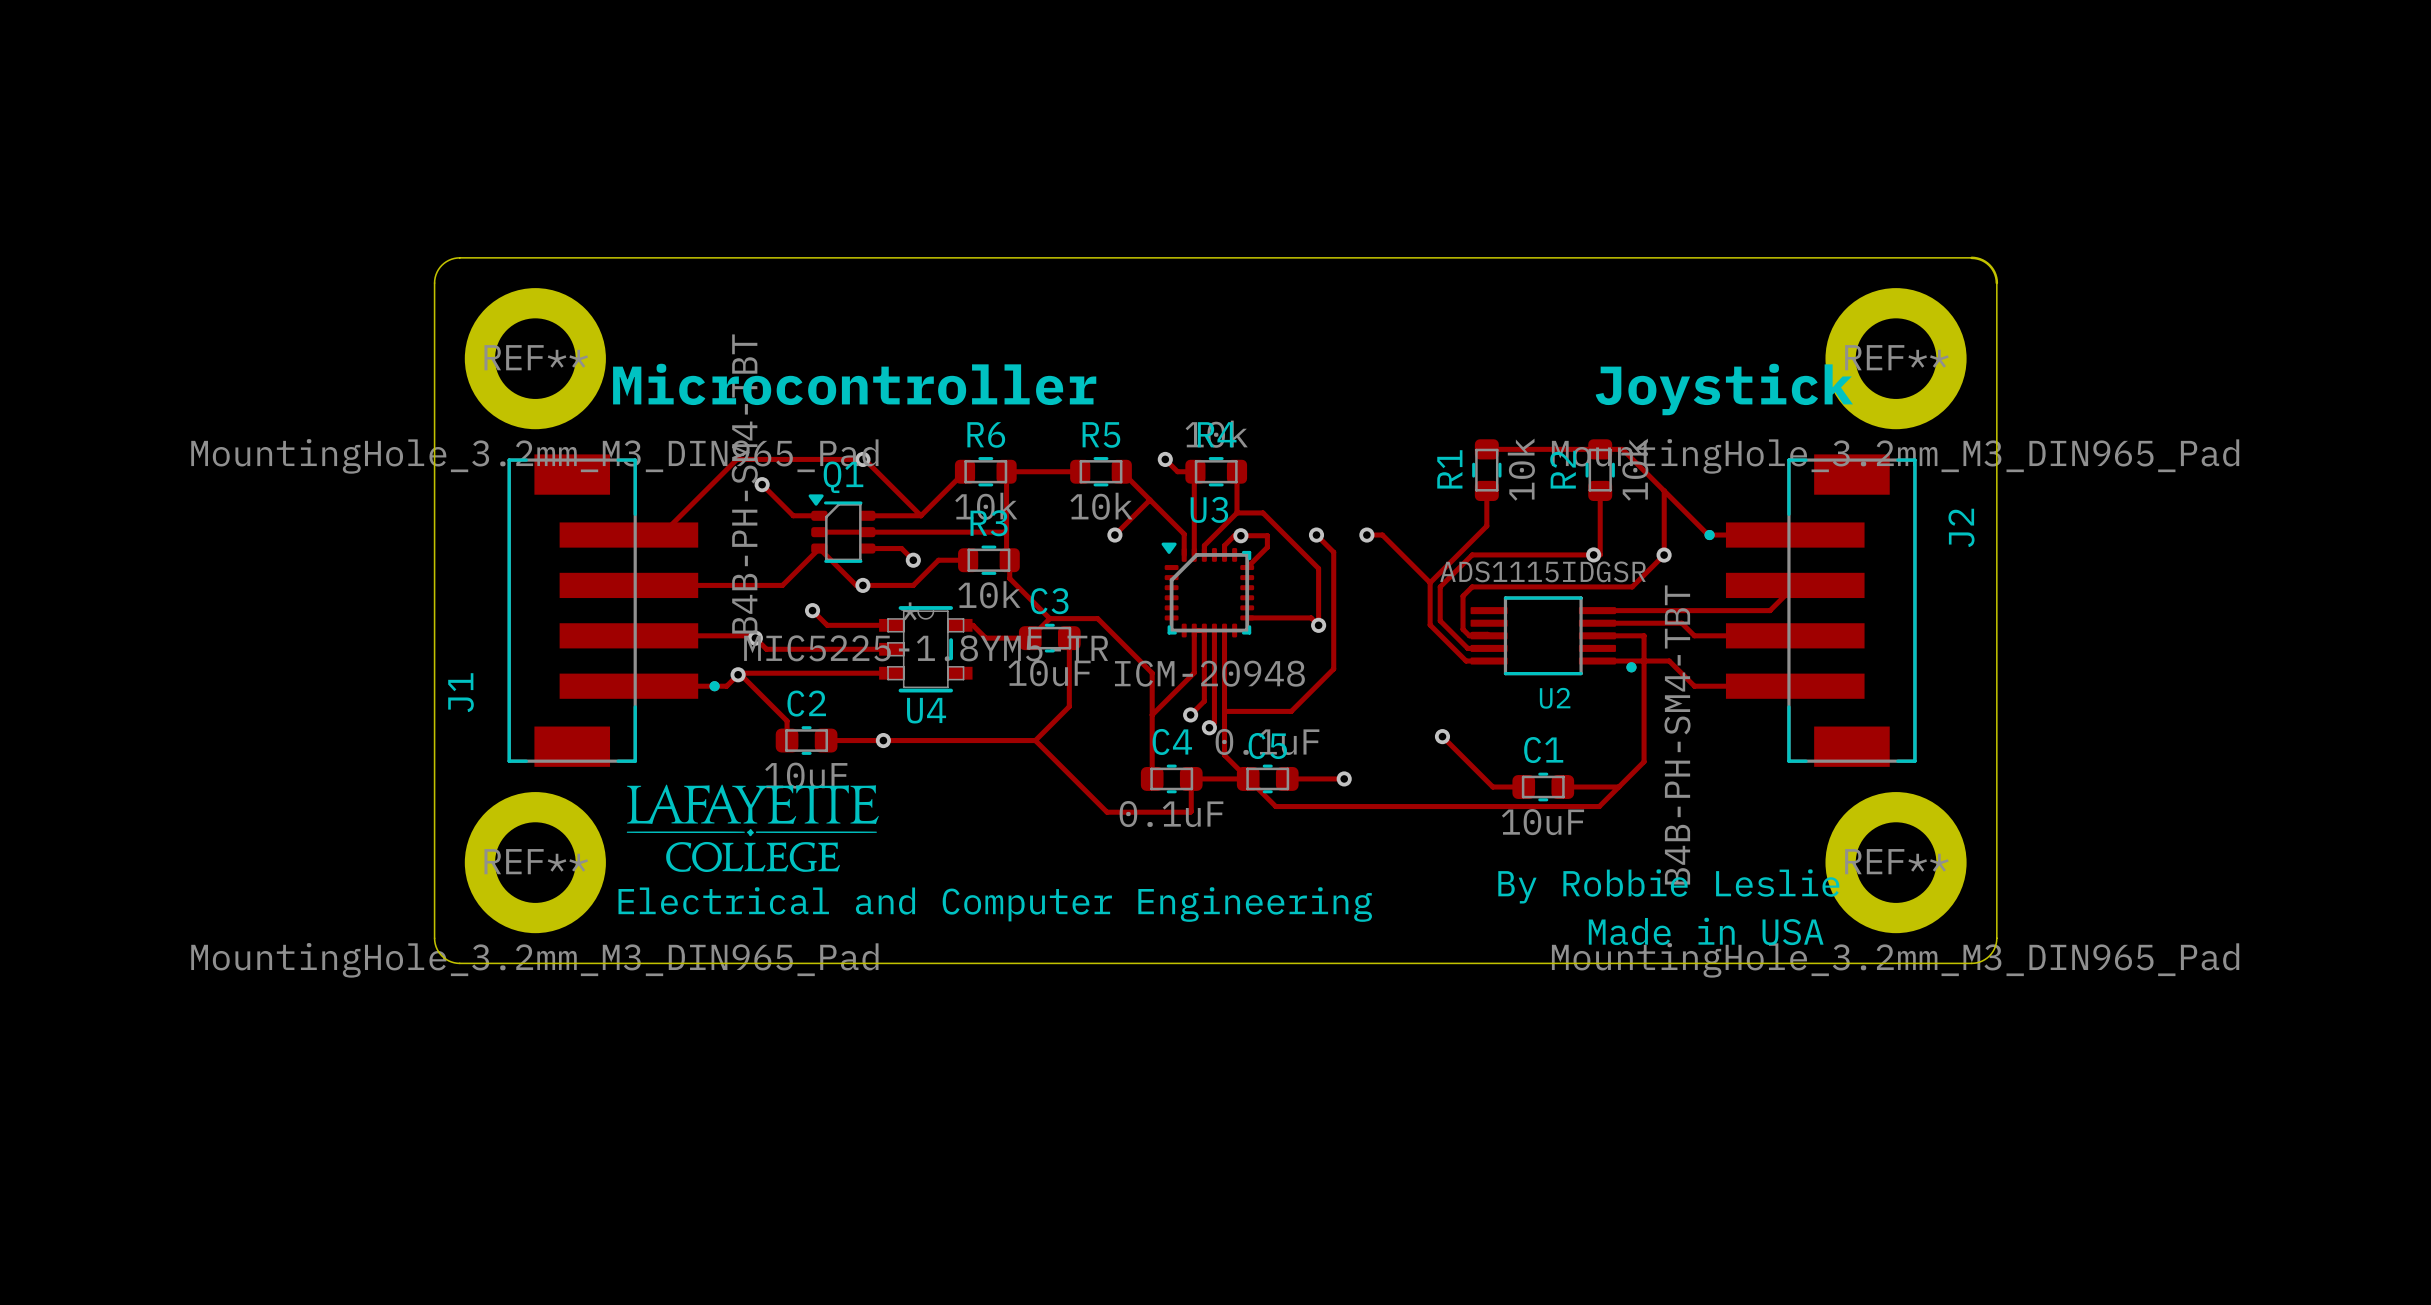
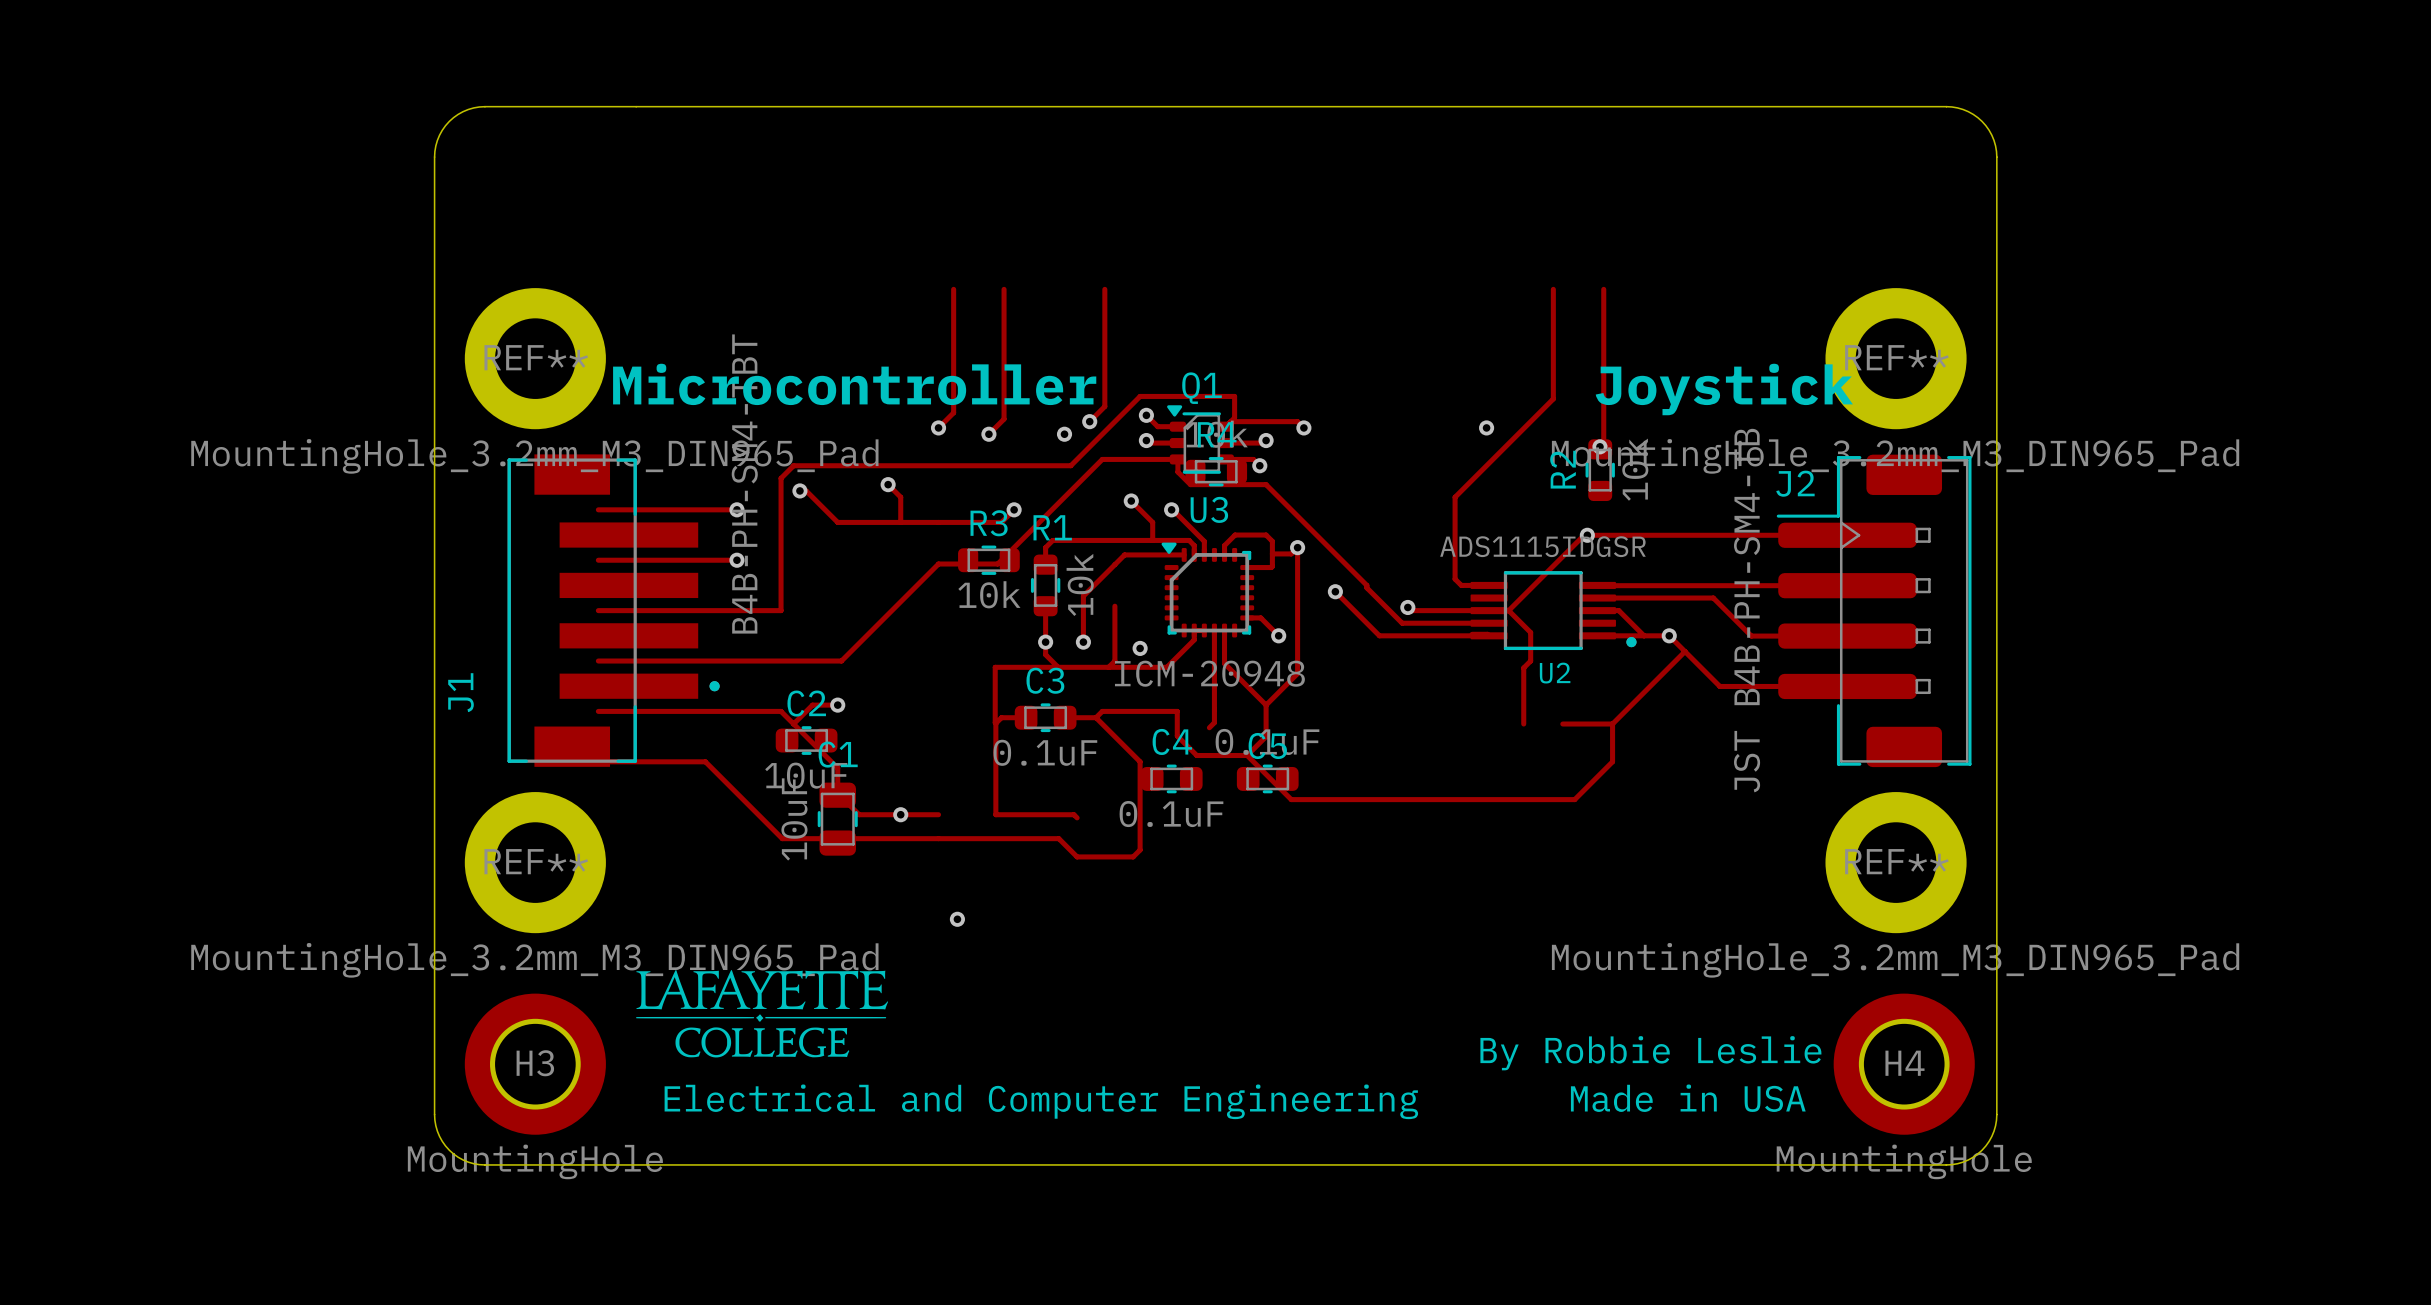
board edge: (434, 283) (437, 272) (441, 265) (451, 259) (459, 257) (1971, 257) (1982, 260) (1989, 265) (1995, 274) (1996, 283) -> (434, 283) (435, 145) (442, 130) (453, 117) (468, 109) (484, 106) (1952, 106) (1968, 111) (1982, 121) (1991, 135) (1995, 145) (1996, 283)
track: none -> (953, 289) (953, 412) (938, 427)
track: none -> (1004, 289) (1004, 419) (988, 434)
track: none -> (1104, 289) (1104, 406) (1089, 421)
track: none -> (1553, 289) (1553, 398) (1455, 497) (1455, 579) (1461, 585) (1489, 585)
track: none -> (1603, 289) (1603, 443) (1599, 446)
track: none -> (1146, 415) (1157, 426) (1177, 426)
via: none -> (1146, 415)
via: none -> (1089, 421)
track: none -> (1230, 421) (1297, 421) (1303, 427)
track: none -> (1225, 426) (1234, 417) (1234, 396) (1140, 396) (1070, 465) (793, 465) (781, 478) (781, 610) (598, 610)
via: none -> (938, 427)
via: none -> (1303, 427)
via: none -> (1486, 427)
via: none -> (988, 434)
via: none -> (1064, 434)
track: none -> (1146, 440) (1148, 443) (1177, 443)
via: none -> (1146, 440)
track: none -> (1266, 440) (1263, 443) (1225, 443)
via: none -> (1266, 440)
via: none -> (1599, 446)
track: (1486, 449) (1622, 449) (1708, 535) (1795, 535) -> none
J2 footprint: [1704, 454, 1917, 767] -> [1776, 454, 1972, 768]
via: (862, 459) -> none
track: (1165, 459) (1177, 471) (1195, 471) (1194, 545) -> (1045, 564) (1045, 547) (1052, 540) (1189, 540) (1194, 545)
via: (1165, 459) -> none
track: none -> (1225, 459) (1253, 459) (1259, 465)
via: none -> (1259, 465)
R1 name rotation: 0° (1449, 469) -> 90° clockwise (1052, 527)
R1 name position: R1 (1449, 469) -> R1 (1052, 527)
R1 position: (1486, 470) -> (1045, 585)
track: (965, 471) (920, 515) -> none
R6: 10k (985, 471) -> none
track: (1080, 471) (1006, 471) (1006, 557) (1009, 560) (1009, 578) (1049, 618) -> none
R5: 10k (1101, 471) -> none
track: (1121, 471) (1184, 534) (1184, 554) -> (1083, 642) (1083, 596) (1124, 554) (1184, 554)
track: (1236, 471) (1236, 512) -> none
track: (762, 484) (793, 515) (819, 515) -> none
via: (762, 484) -> none
track: none -> (888, 484) (900, 497) (900, 522)
via: none -> (888, 484)
track: none -> (799, 490) (806, 490) (837, 522) (1001, 522) (1014, 509)
via: none -> (799, 490)
track: (1486, 490) (1486, 526) (1430, 582) -> none
track: (1600, 490) (1600, 554) (1472, 554) (1440, 586) (1440, 620) (1467, 648) (1489, 648) -> none
track: (1664, 490) (1664, 554) (1632, 586) (1472, 586) (1463, 596) (1463, 629) (1469, 635) -> (1335, 591) (1379, 635) (1469, 635)
track: (1150, 499) (1114, 535) -> none
track: none -> (1131, 501) (1152, 522) (1152, 540)
via: none -> (1131, 501)
track: none -> (598, 509) (736, 509)
via: none -> (736, 509)
via: none -> (1014, 509)
via: none -> (1171, 509)
track: (1236, 512) (1204, 545) -> (1171, 509) (1204, 541) (1204, 545)
track: (1236, 512) (1262, 512) (1318, 568) (1318, 625) (1311, 617) (1260, 617) -> (1278, 635) (1260, 617)
track: (867, 515) (920, 515) -> none
track: (920, 515) (864, 459) (736, 459) (661, 535) (628, 535) -> none
J2 name position: J2 (1961, 527) -> J2 (1795, 483)
Q1 position: (842, 528) -> (1200, 439)
track: (819, 532) (1003, 532) (1006, 535) -> none
via: (1114, 535) -> none
track: (1234, 535) (1267, 535) (1267, 547) (1247, 567) -> (1234, 535) (1266, 535) (1272, 541) (1272, 566) (1247, 567)
via: (1240, 535) -> none
track: none -> (1316, 535) (1266, 484) (1190, 484) (1177, 472) (1177, 459) (1102, 459) (997, 564) (938, 564) (841, 661) (598, 661)
via position: (1316, 535) -> (1297, 547)
track: (1366, 535) (1382, 535) (1430, 582) -> none
via: (1366, 535) -> none
track: none -> (1847, 535) (1584, 535) (1508, 610)
track: (867, 548) (901, 548) (913, 560) -> none
track: (1333, 552) (1333, 668) (1291, 711) (1224, 711) -> (1333, 552) (1402, 623) (1489, 623)
track: none -> (1272, 553) (1291, 553) (1297, 547) (1297, 673) (1266, 705)
via position: (1593, 554) -> (1587, 535)
via: (1664, 555) -> none
track: none -> (598, 560) (736, 560)
via: none -> (736, 560)
via: (913, 560) -> none
track: (968, 560) (938, 560) (913, 585) (856, 585) (819, 548) (782, 585) (628, 585) -> none
track: (1430, 582) (1430, 625) (1466, 661) (1489, 661) -> none
via: (862, 585) -> none
track: none -> (1597, 585) (1847, 585)
track: (1795, 585) (1770, 610) (1618, 610) -> (1847, 686) (1719, 686) (1669, 635) (1644, 635) (1618, 610)
via: none -> (1335, 591)
track: none -> (1597, 598) (1713, 598) (1751, 636) (1847, 636)
track: none -> (1404, 604) (1410, 610) (1508, 610)
track: none -> (1045, 606) (1045, 654) (1058, 667)
track: none -> (1114, 606) (1114, 661) (1108, 667)
via: none -> (1407, 607)
track: (812, 610) (827, 625) (891, 625) -> none
via: (812, 610) -> none
track: none -> (1508, 610) (1530, 632) (1530, 661) (1523, 667) (1523, 724)
track: (1049, 618) (1097, 618) (1152, 673) (1152, 778) -> none
track: (1049, 618) (1030, 638) (985, 638) (973, 625) (960, 625) -> none
track: (1597, 623) (1681, 623) (1694, 635) (1795, 635) -> none
via: (1318, 625) -> none
track: (1204, 630) (1204, 701) (1190, 714) -> none
track: (628, 635) (753, 635) (766, 649) (891, 649) -> none
via: none -> (1278, 635)
U2 position: (1553, 635) -> (1553, 610)
track: (1644, 635) (1644, 761) (1599, 806) (1275, 806) (1224, 755) (1224, 663) -> (1266, 705) (1224, 663)
via: none -> (1669, 635)
via: (755, 638) -> none
C3 position: (1049, 638) -> (1045, 717)
track: (1069, 638) (1069, 706) (1035, 740) -> none
track: (1194, 639) (1194, 672) (1152, 714) -> (1194, 639) (1166, 667) (995, 667) (995, 723)
via: none -> (1045, 642)
via: none -> (1083, 642)
via: none -> (1140, 648)
U4: MIC5225-1.8YM5-TR (925, 649) -> none
track: none -> (1685, 651) (1612, 724)
track: (1597, 661) (1669, 661) (1694, 686) (1795, 686) -> none
track: (739, 673) (787, 721) (787, 740) -> none
track: (891, 673) (739, 673) (726, 686) (628, 686) -> none
C3 value: 10uF (1049, 673) -> 0.1uF (1045, 752)
via: (738, 674) -> none
track: none -> (837, 705) (812, 705) (793, 724)
via: none -> (837, 705)
track: none -> (1266, 705) (1266, 736) (1247, 755)
track: none -> (598, 711) (781, 711) (837, 768) (837, 799) (844, 799) (859, 814) (938, 814)
via: (1190, 714) -> none
track: none -> (1026, 717) (1001, 717) (995, 723)
track: none -> (1065, 717) (1096, 717)
track: none -> (1096, 717) (1102, 711) (1177, 711) (1177, 735) (1196, 755) (1247, 755)
track: none -> (1096, 717) (1140, 761) (1140, 850) (1133, 856) (1077, 856) (1058, 838) (782, 838) (705, 761) (598, 761)
track: none -> (995, 723) (995, 814) (1073, 814) (1077, 817)
track: none -> (1562, 724) (1612, 724)
track: none -> (1612, 724) (1612, 761) (1574, 799) (1291, 799) (1247, 755)
via: (1209, 727) -> none
J2 value: B4B-PH-SM4-TBT (1677, 734) -> JST B4B-PH-SM4-TB (1747, 610)
track: (1442, 736) (1492, 787) (1523, 787) -> none
via: (1442, 736) -> none
track: (826, 740) (1035, 740) -> none
via: (883, 740) -> none
track: (1035, 740) (1107, 812) (1190, 812) (1191, 778) (1248, 778) -> none
C1 footprint: [1512, 772, 1575, 802] -> [817, 782, 858, 856]
track: (1287, 778) (1344, 778) -> none
via: (1344, 778) -> none
track: (1562, 787) (1618, 787) -> none
via: none -> (900, 814)
C1 value position: 10uF (1542, 822) -> 10uF (794, 819)
drawing position: (752, 828) -> (762, 1013)
text position: By Robbie Leslie (1668, 886) -> By Robbie Leslie (1650, 1053)
text position: Electrical and Computer Engineering (995, 904) -> Electrical and Computer Engineering (1041, 1101)
via: none -> (957, 919)
text position: Made in USA (1706, 931) -> Made in USA (1688, 1098)
board edge: (434, 938) (437, 949) (441, 956) (448, 960) (459, 963) (1971, 963) (1979, 961) (1989, 956) (1994, 949) (1996, 938) -> (434, 938) (435, 1125) (442, 1141) (453, 1153) (468, 1162) (484, 1164) (1952, 1164) (1968, 1159) (1982, 1150) (1989, 1141) (1995, 1125) (1996, 938)
H3: none -> MountingHole (535, 1064)
H4: none -> MountingHole (1904, 1064)

